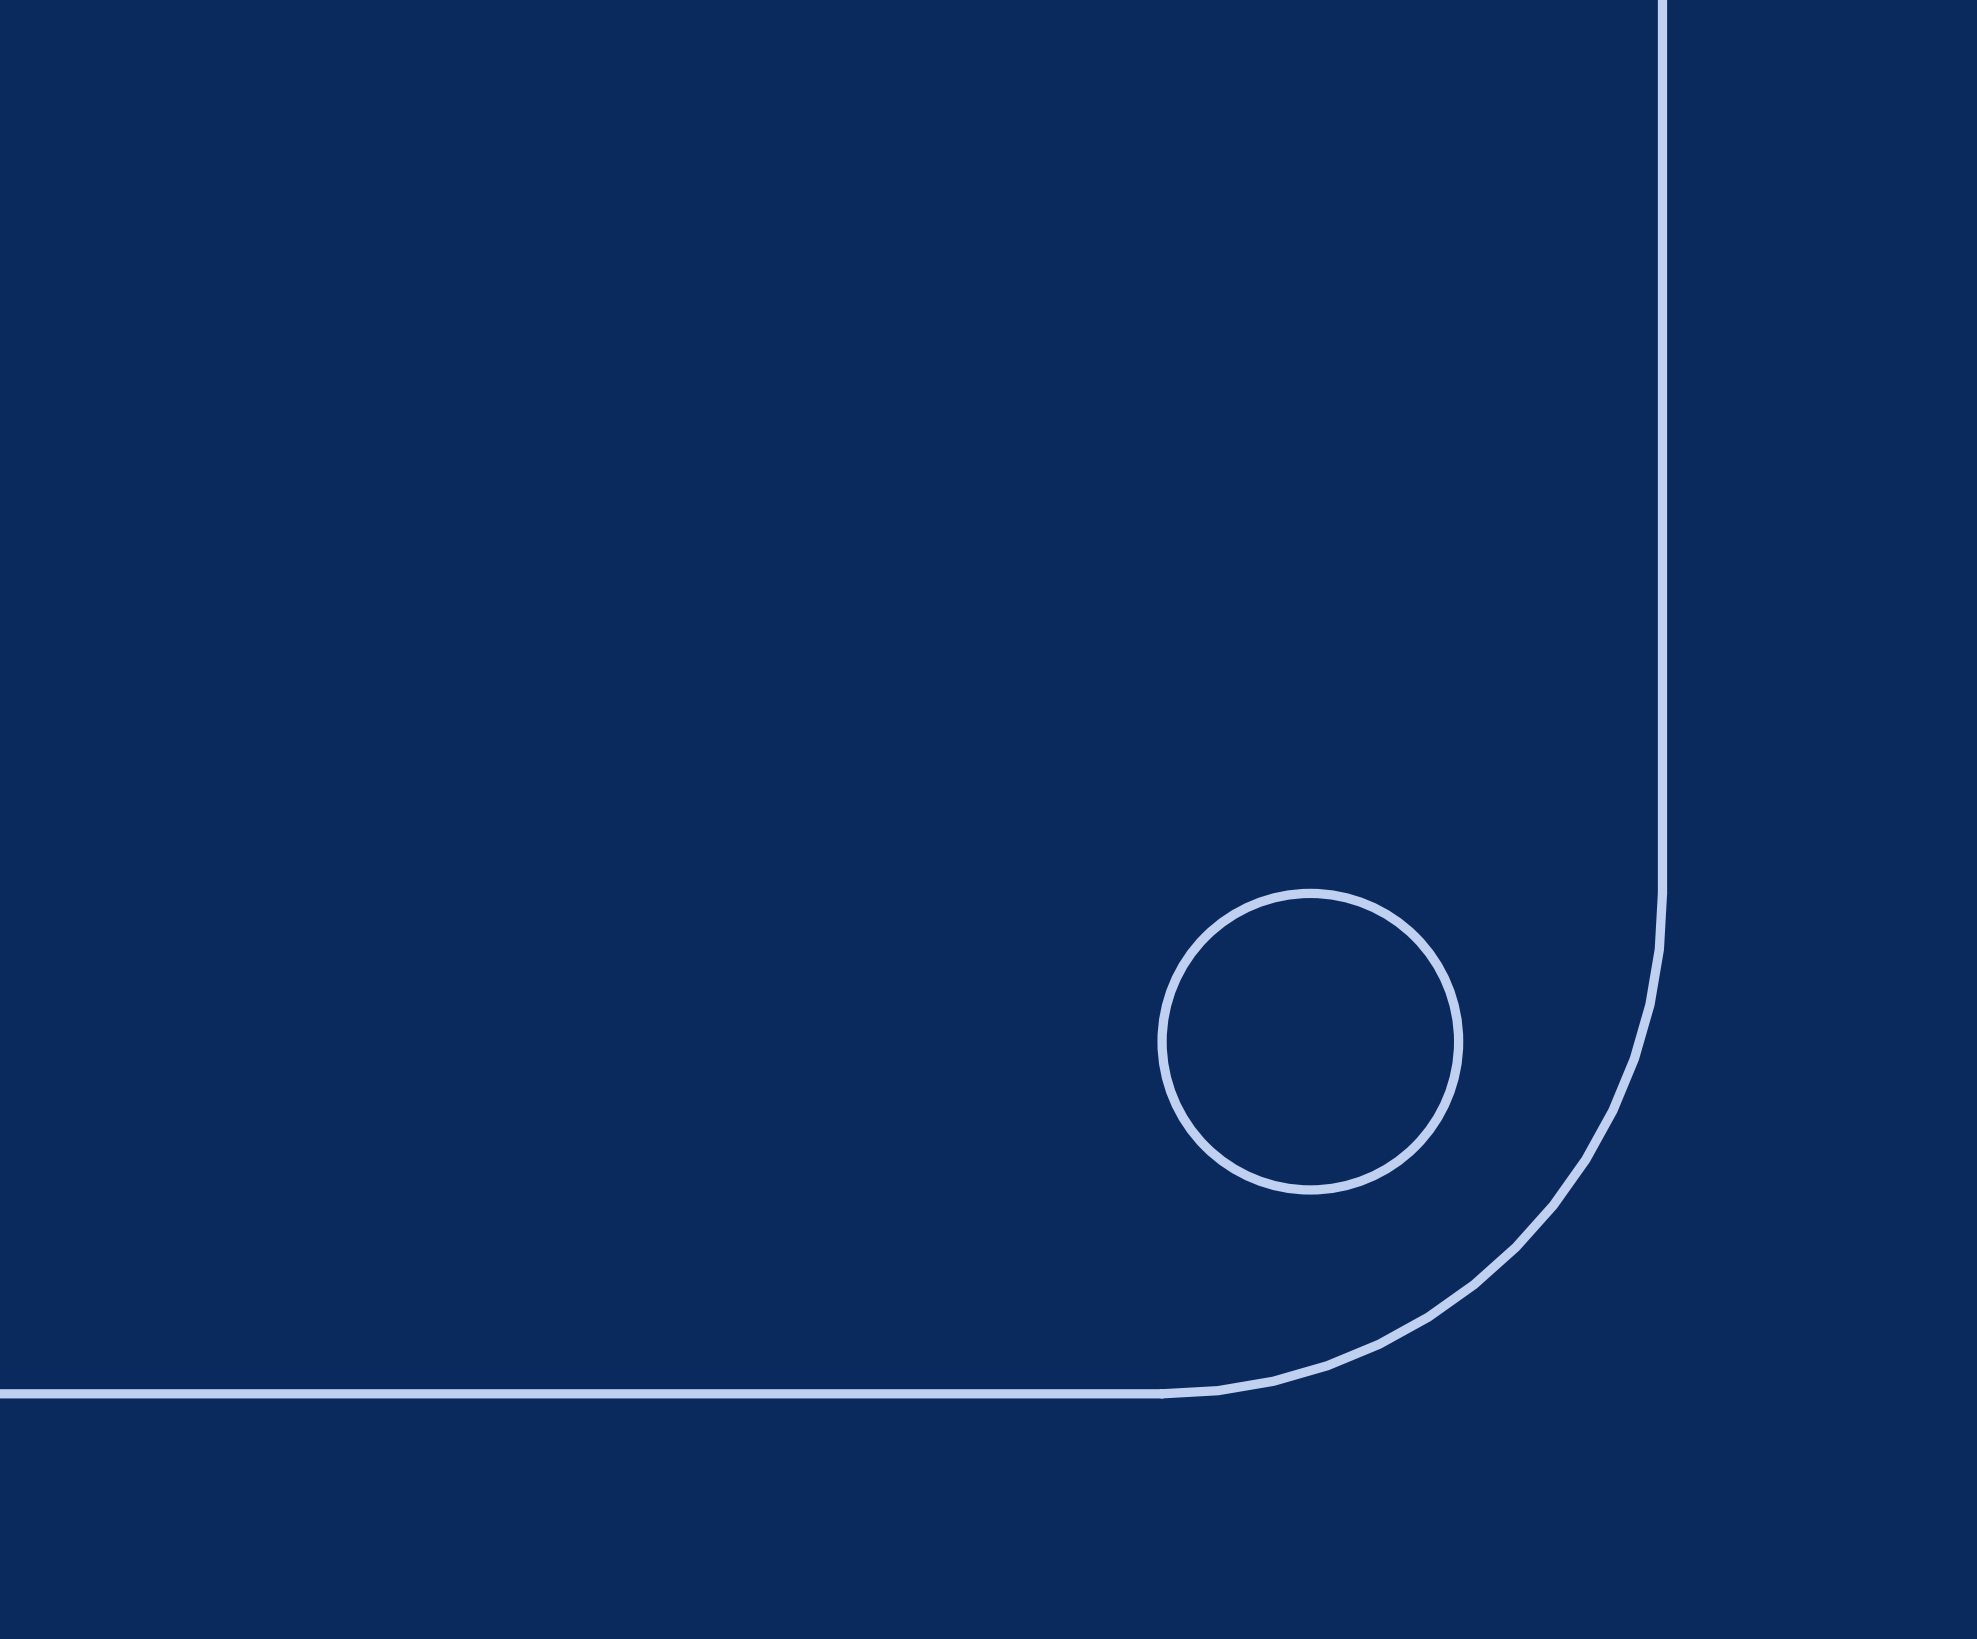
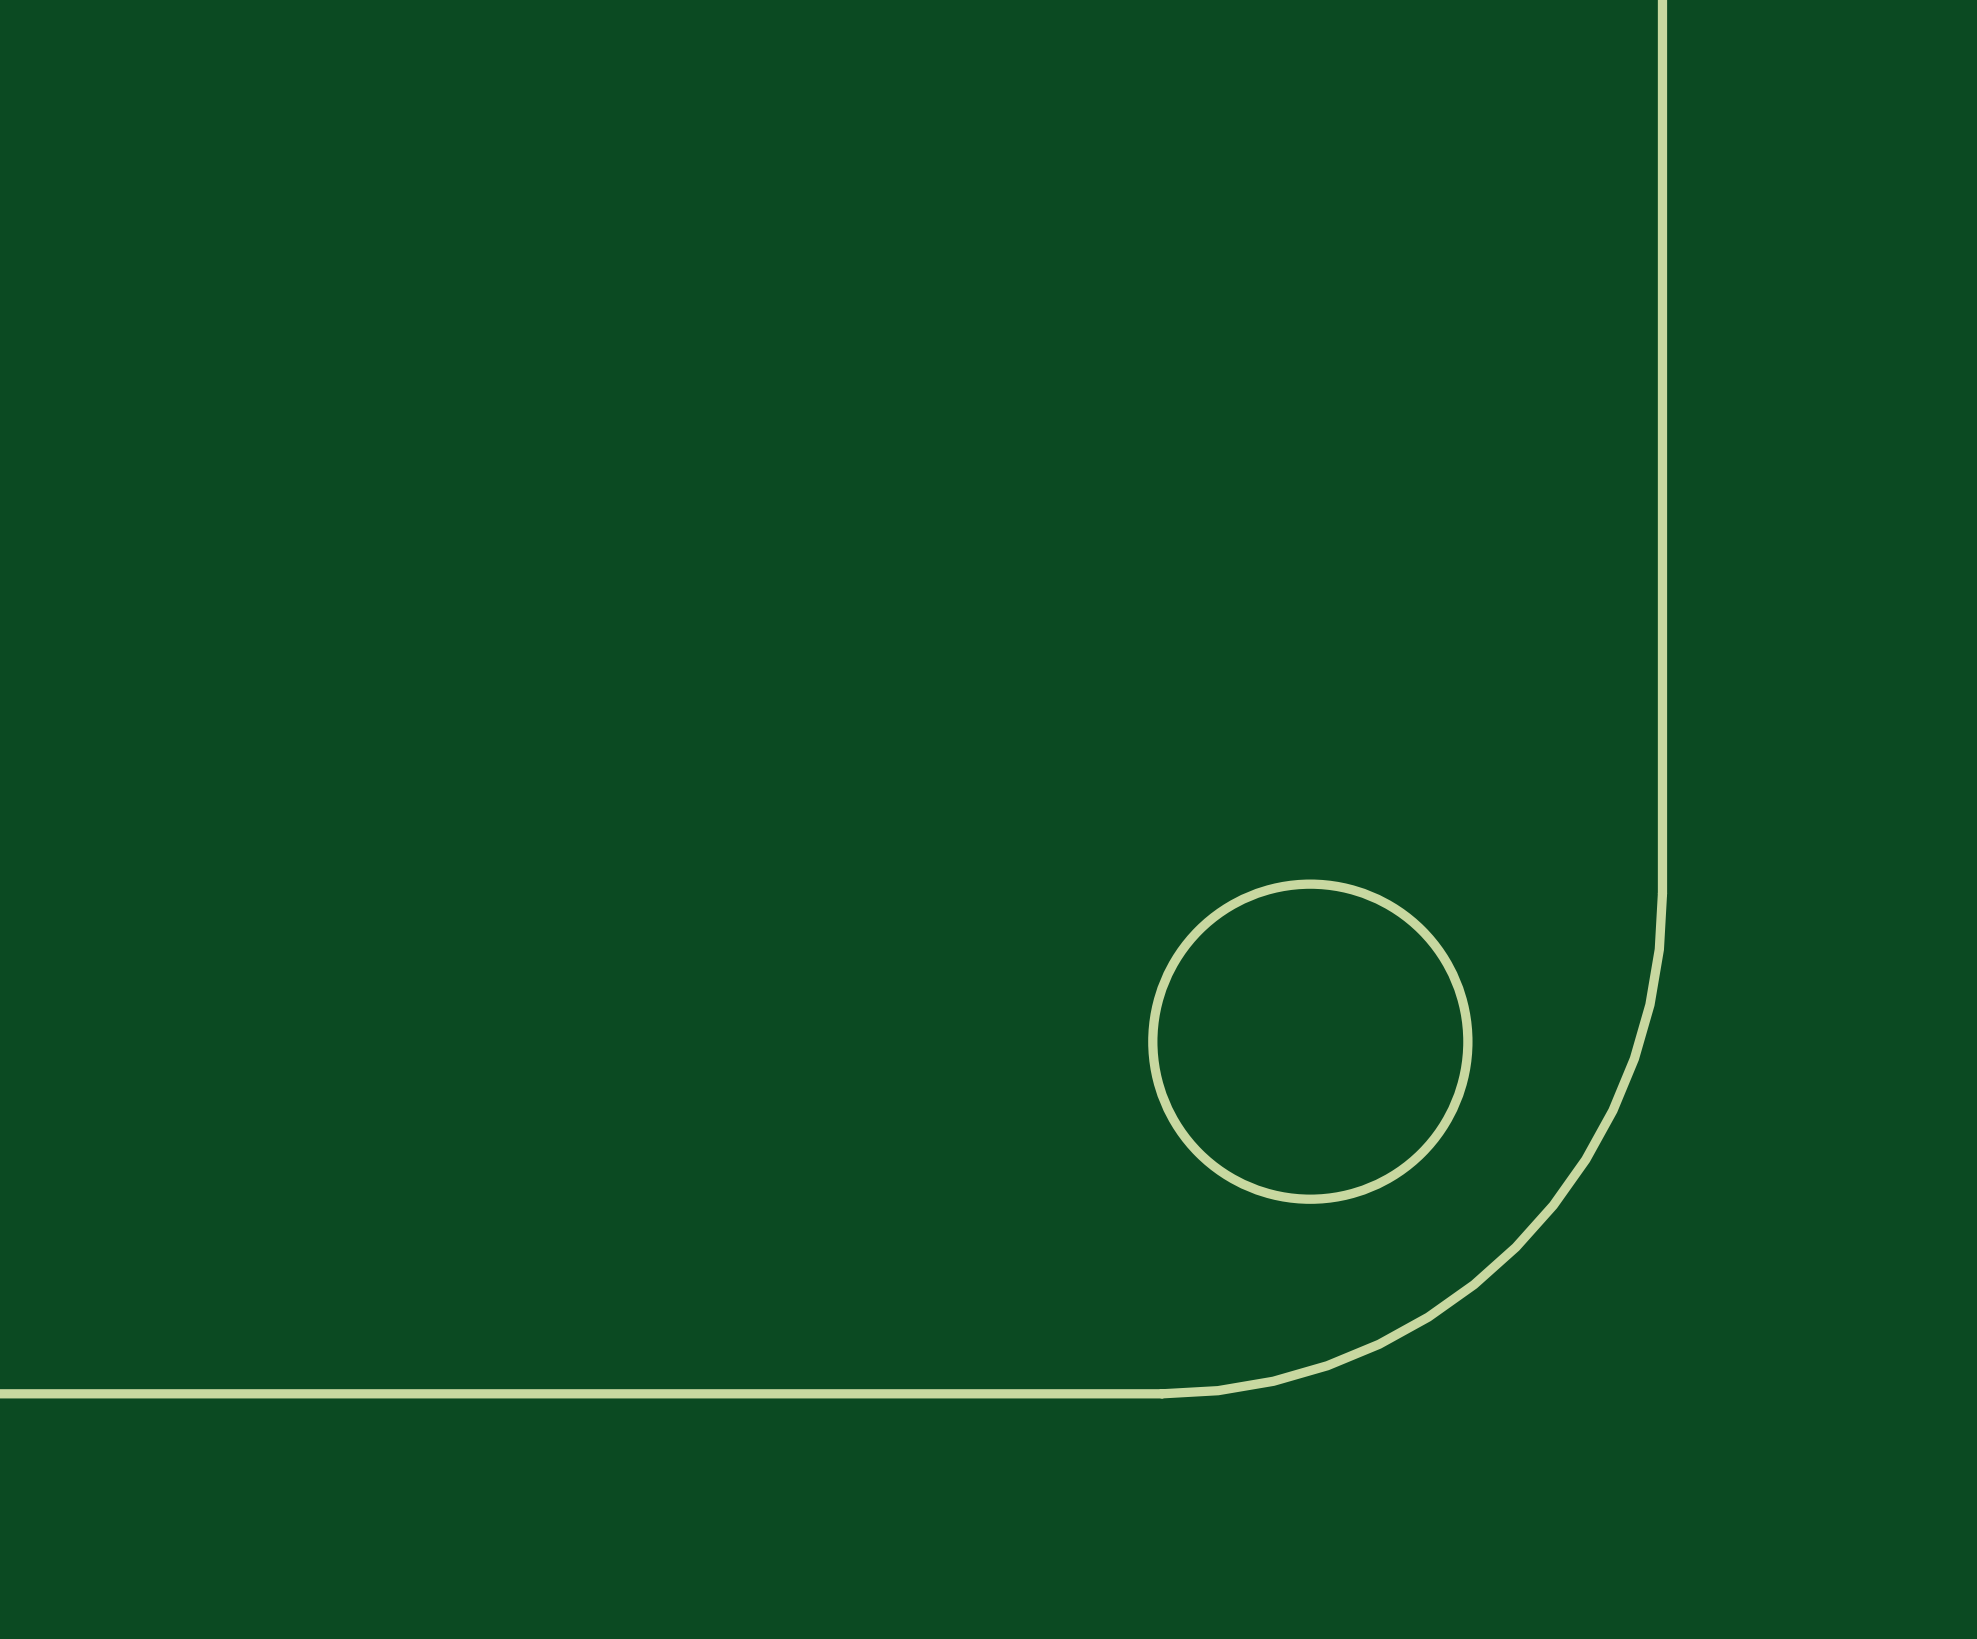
round board edge size: [1157, 888, 1464, 1195] -> [1148, 879, 1473, 1204]

